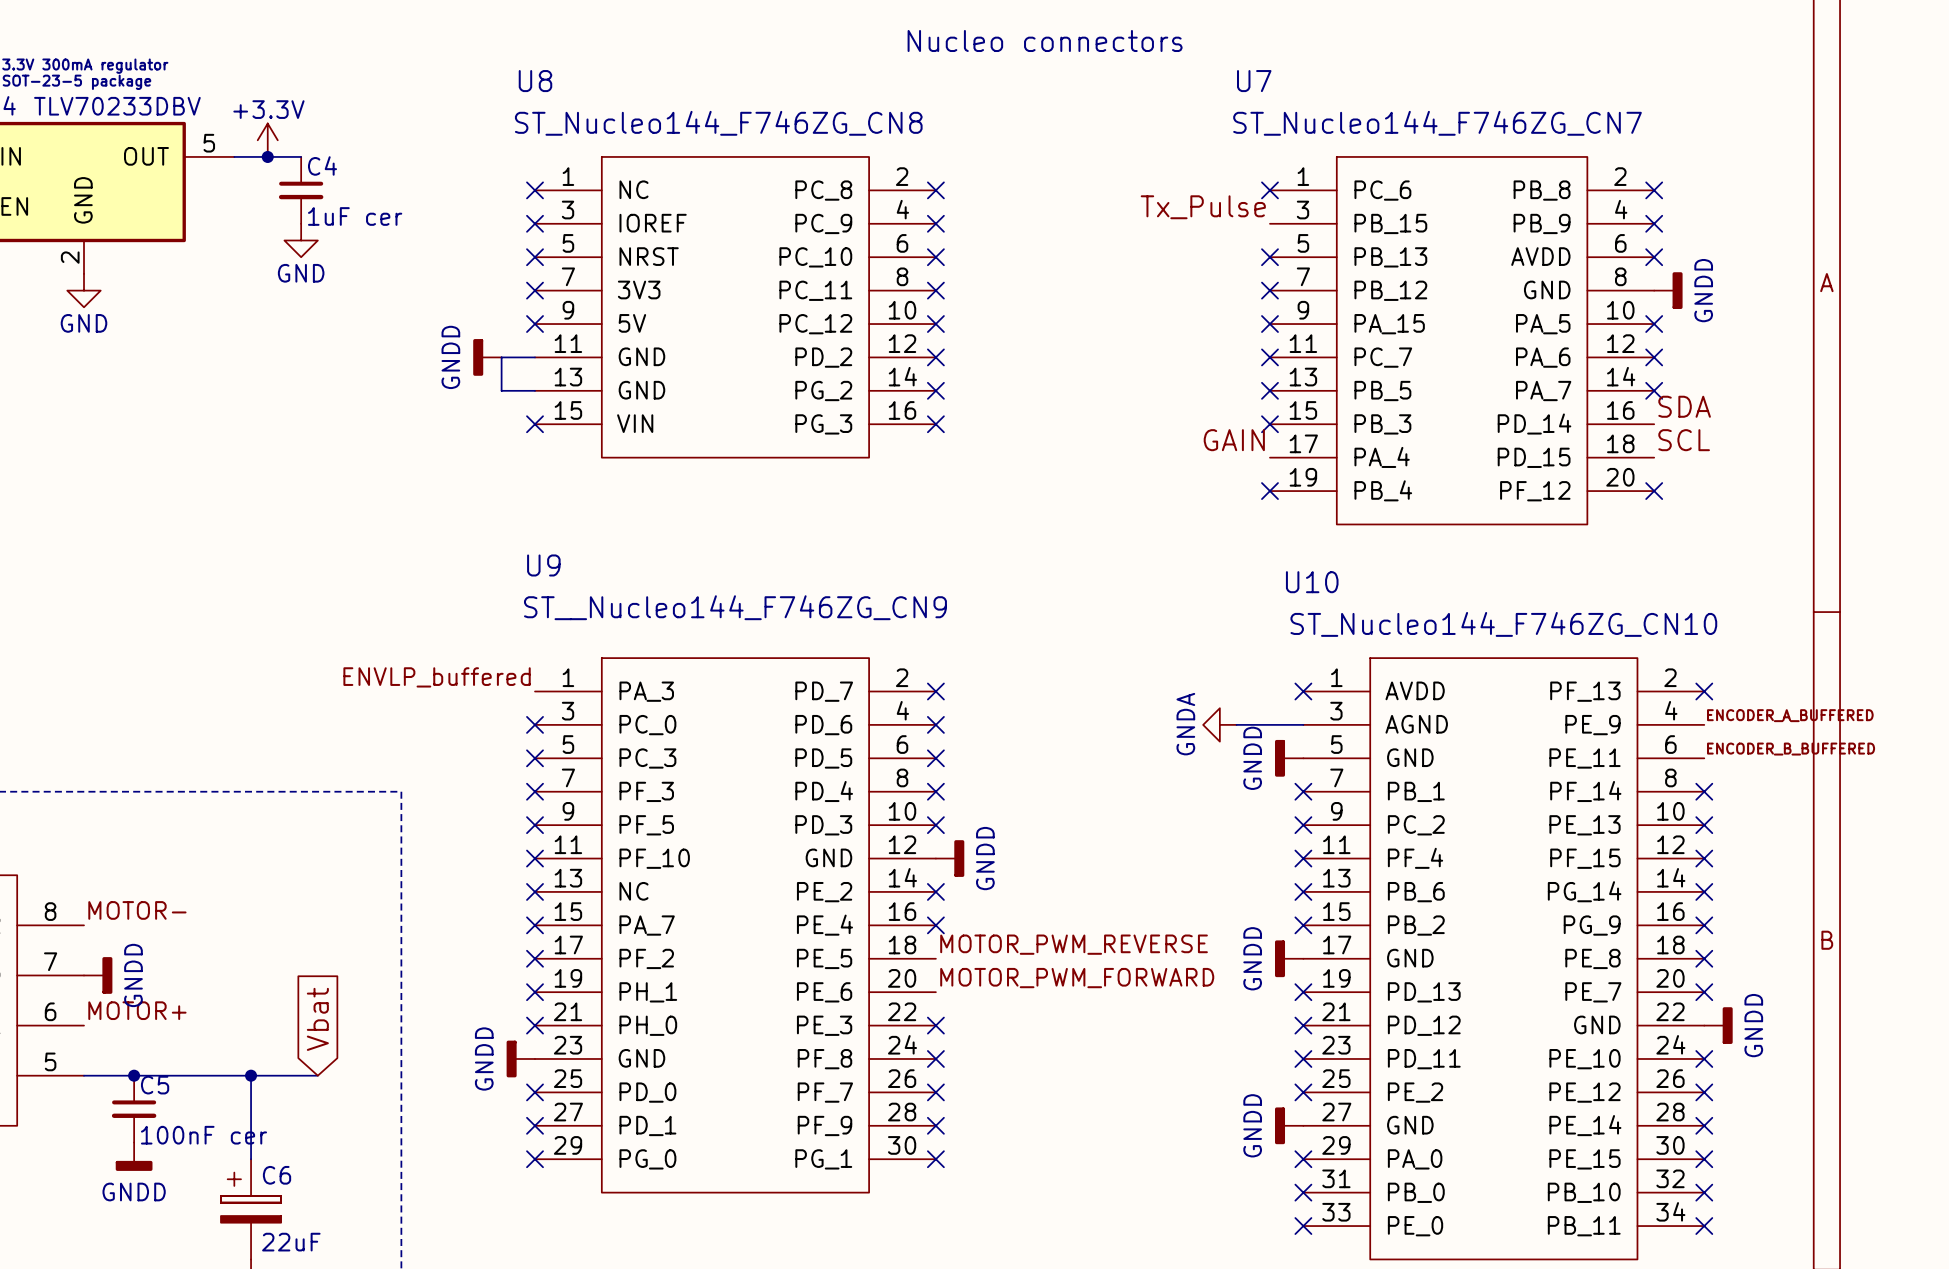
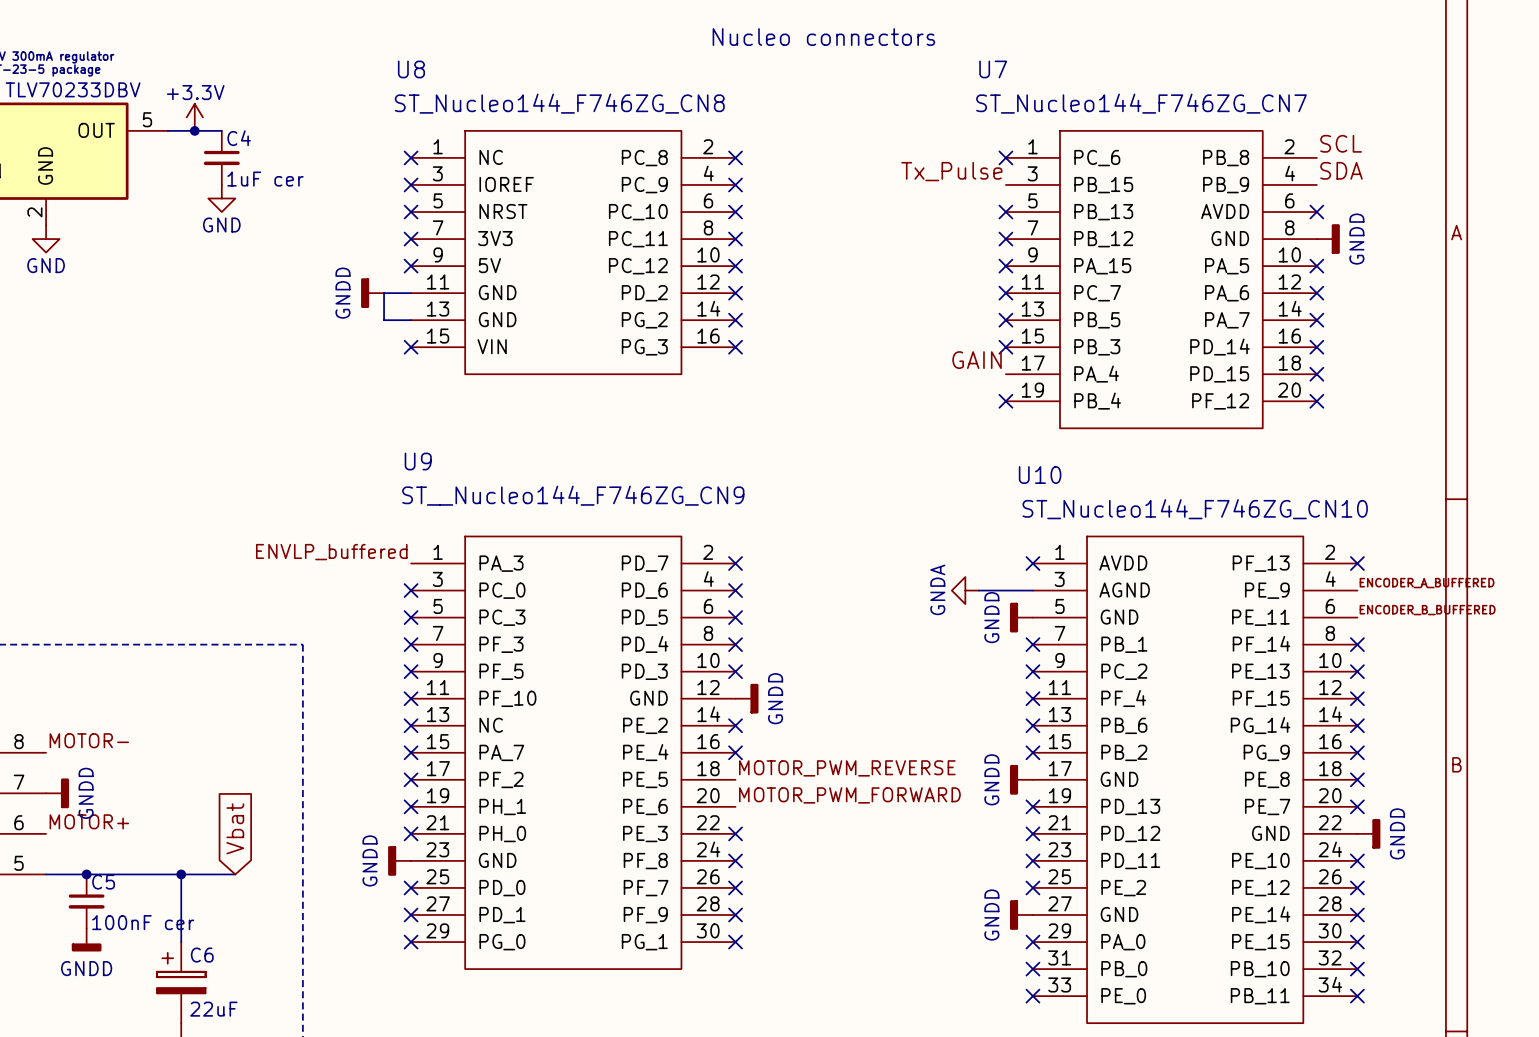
no-connect mark: (1654, 190) -> none
no-connect mark: (1654, 223) -> none
label position: SDA (1684, 406) -> SDA (1341, 170)
no-connect mark: none -> (1316, 347)
label position: SCL (1684, 440) -> SCL (1341, 143)
no-connect mark: none -> (1316, 374)

